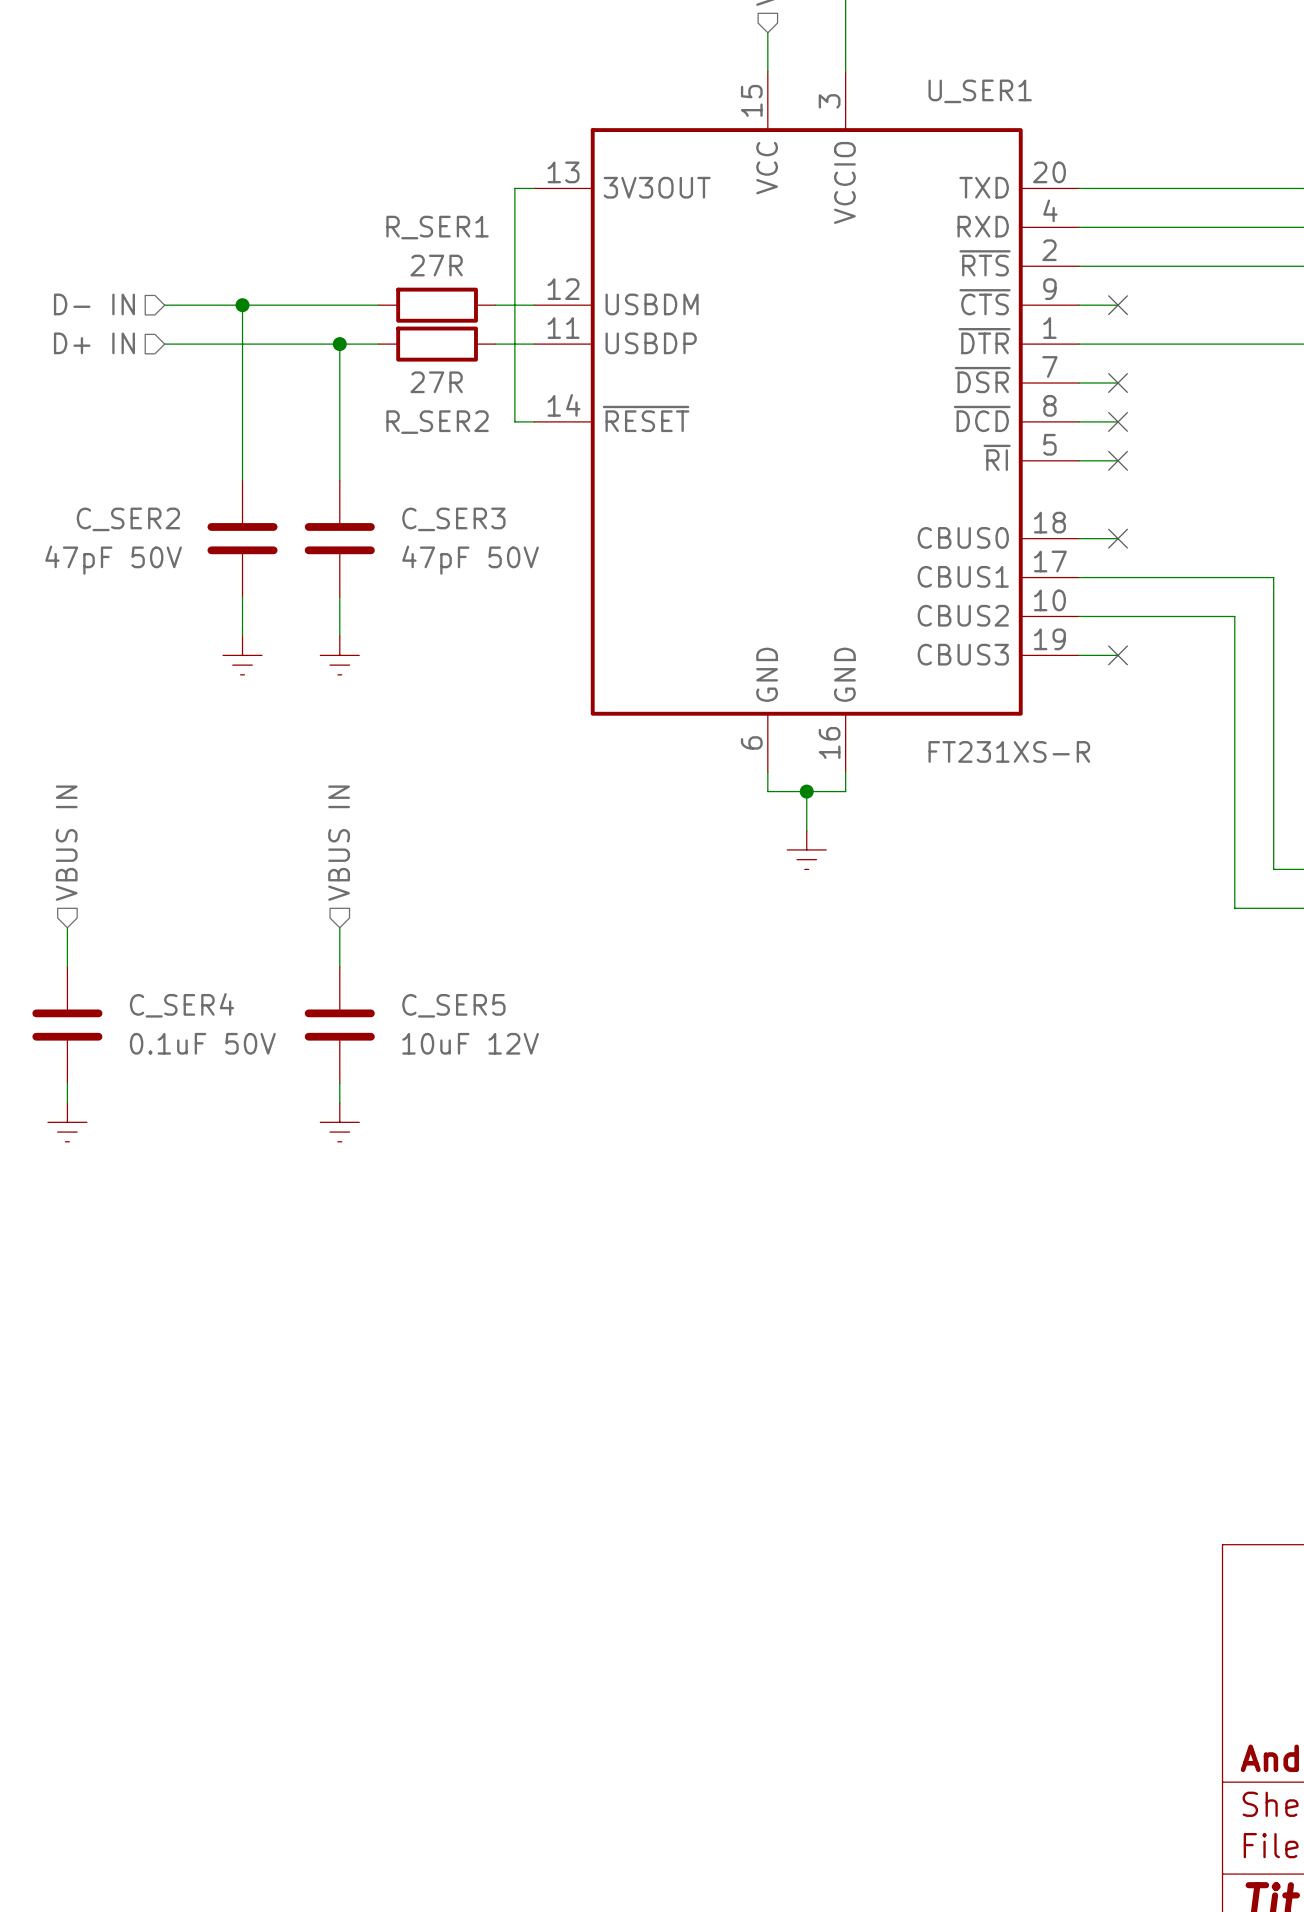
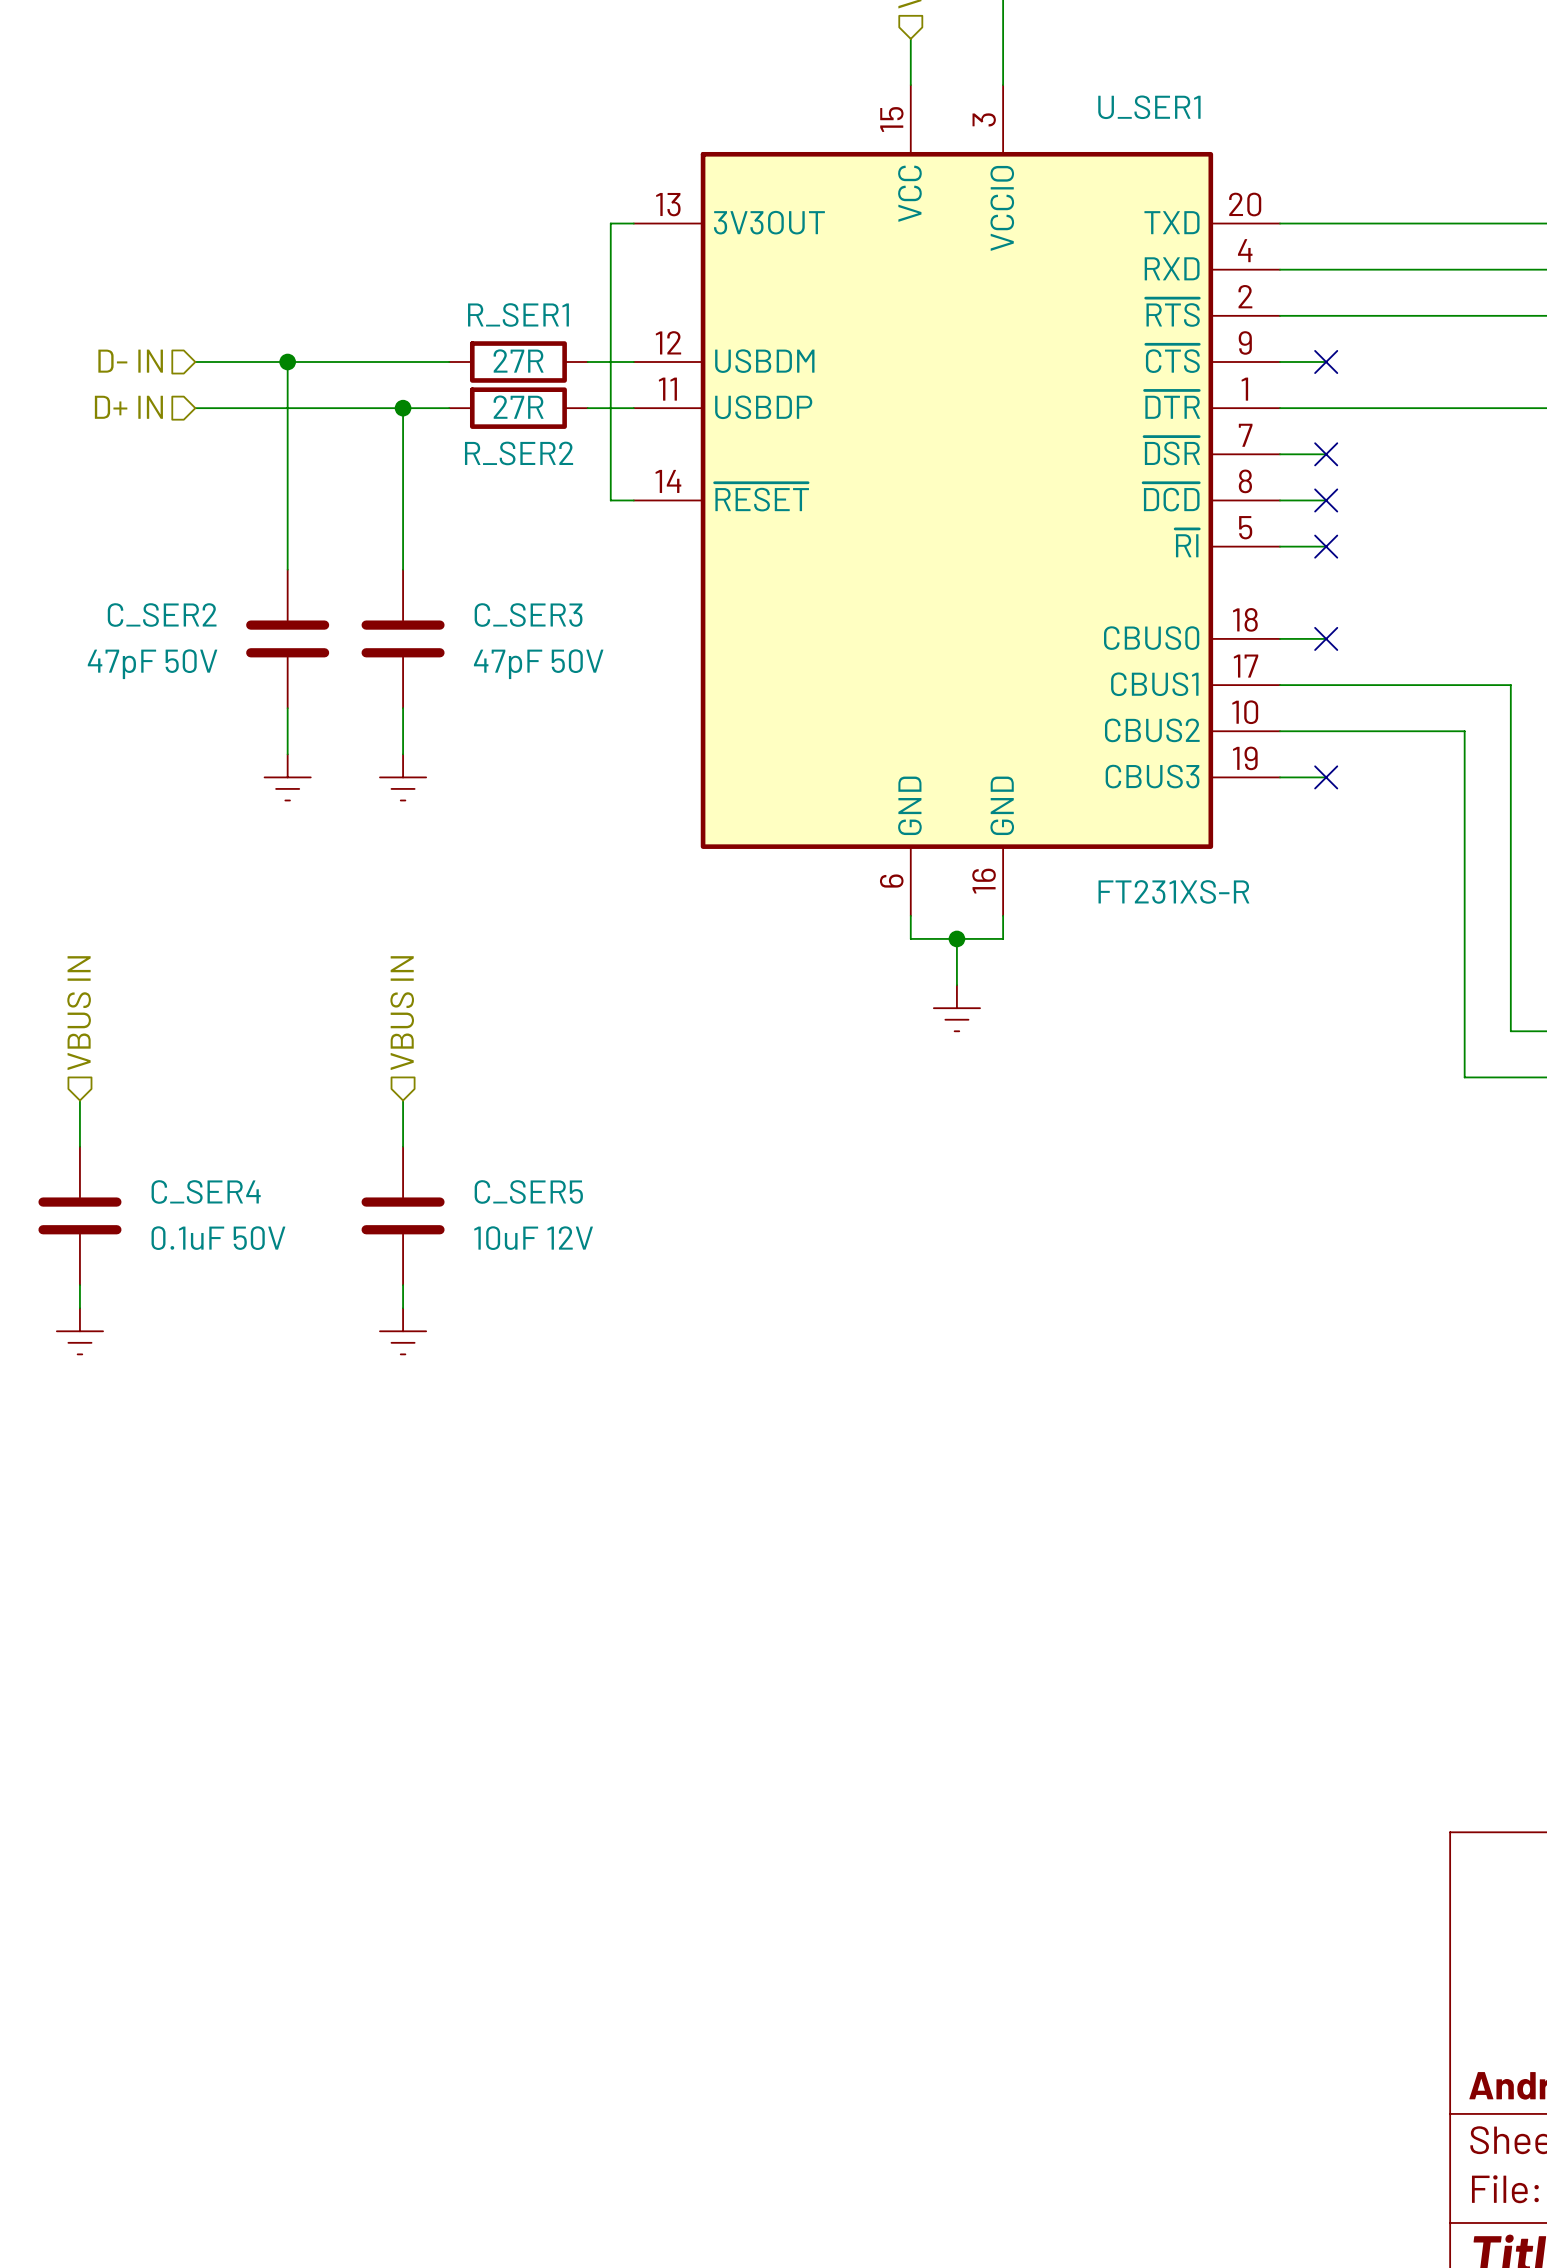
R_SER1 name position: R_SER1 (437, 227) -> R_SER1 (518, 314)
R_SER1 value position: 27R (436, 265) -> 27R (518, 361)
R_SER2 value position: 27R (436, 382) -> 27R (518, 407)
R_SER2 name position: R_SER2 (437, 422) -> R_SER2 (519, 453)

